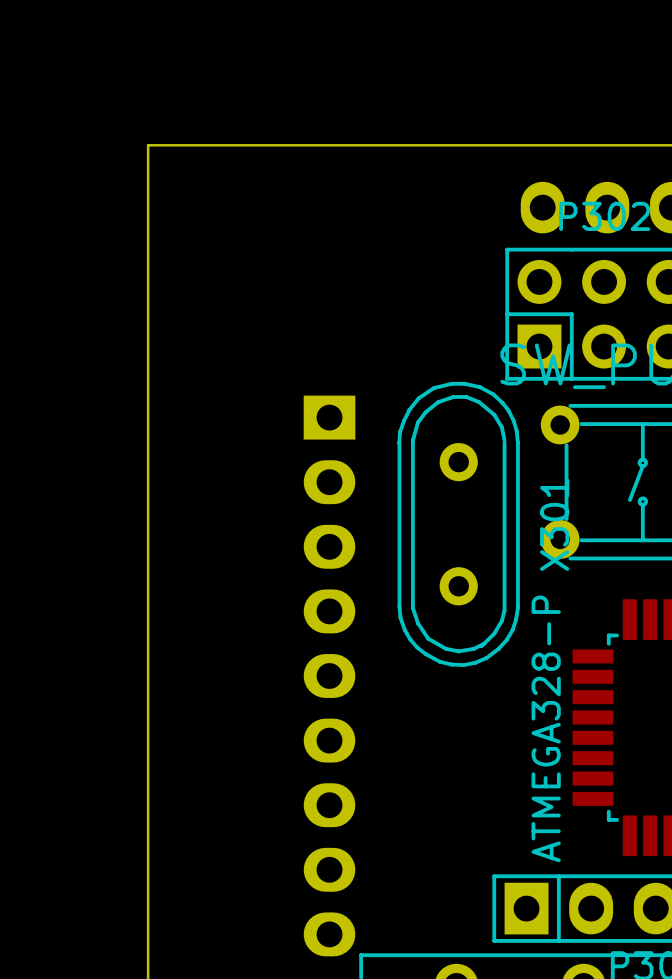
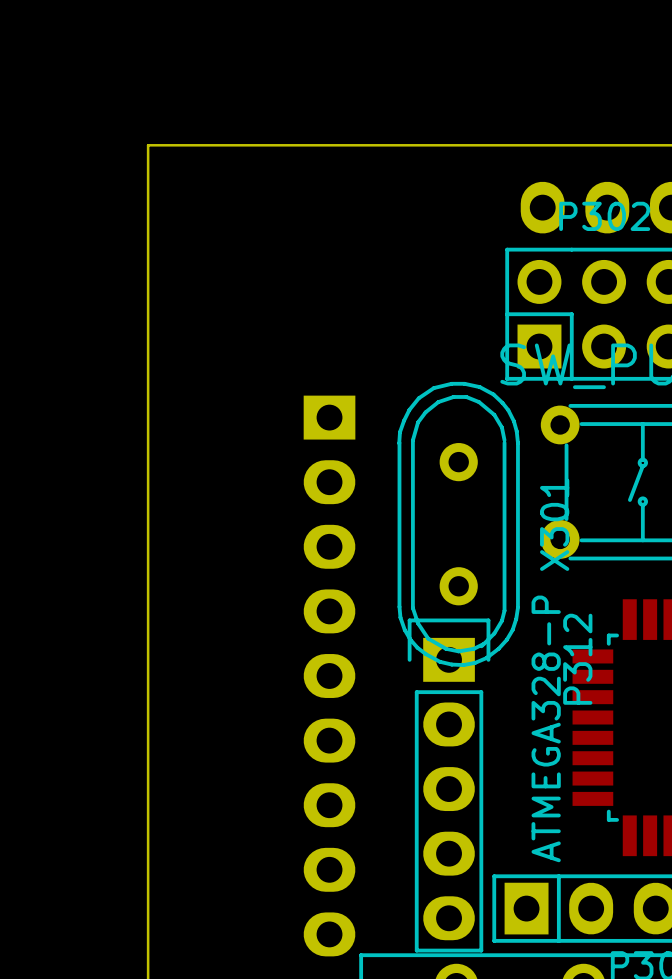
P312: none -> (449, 785)

